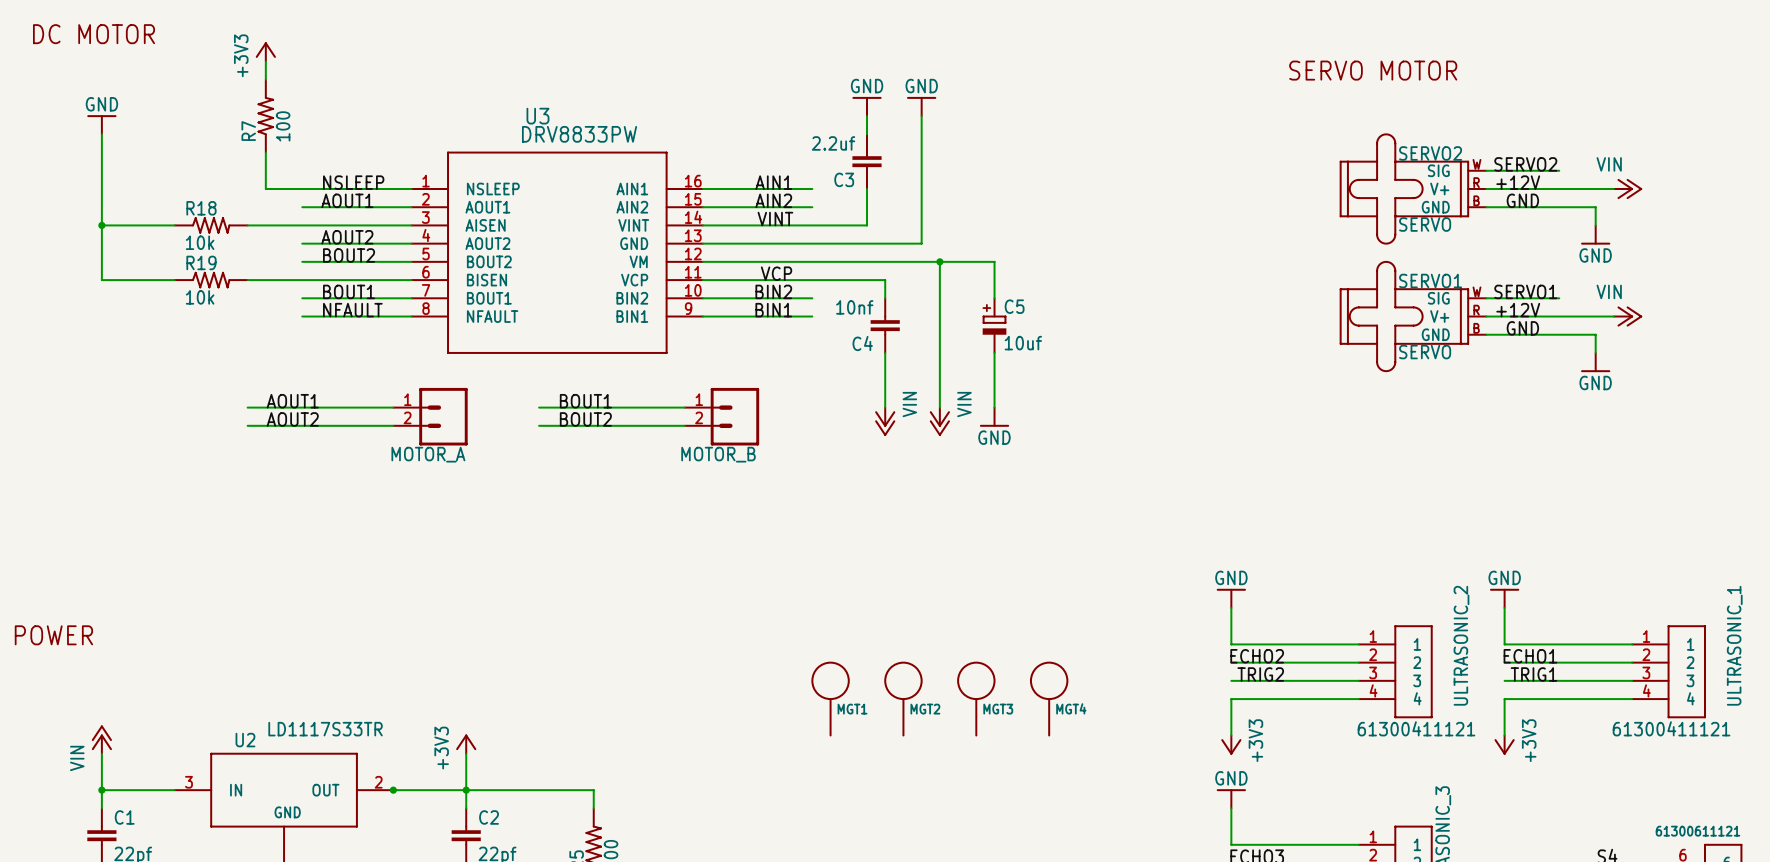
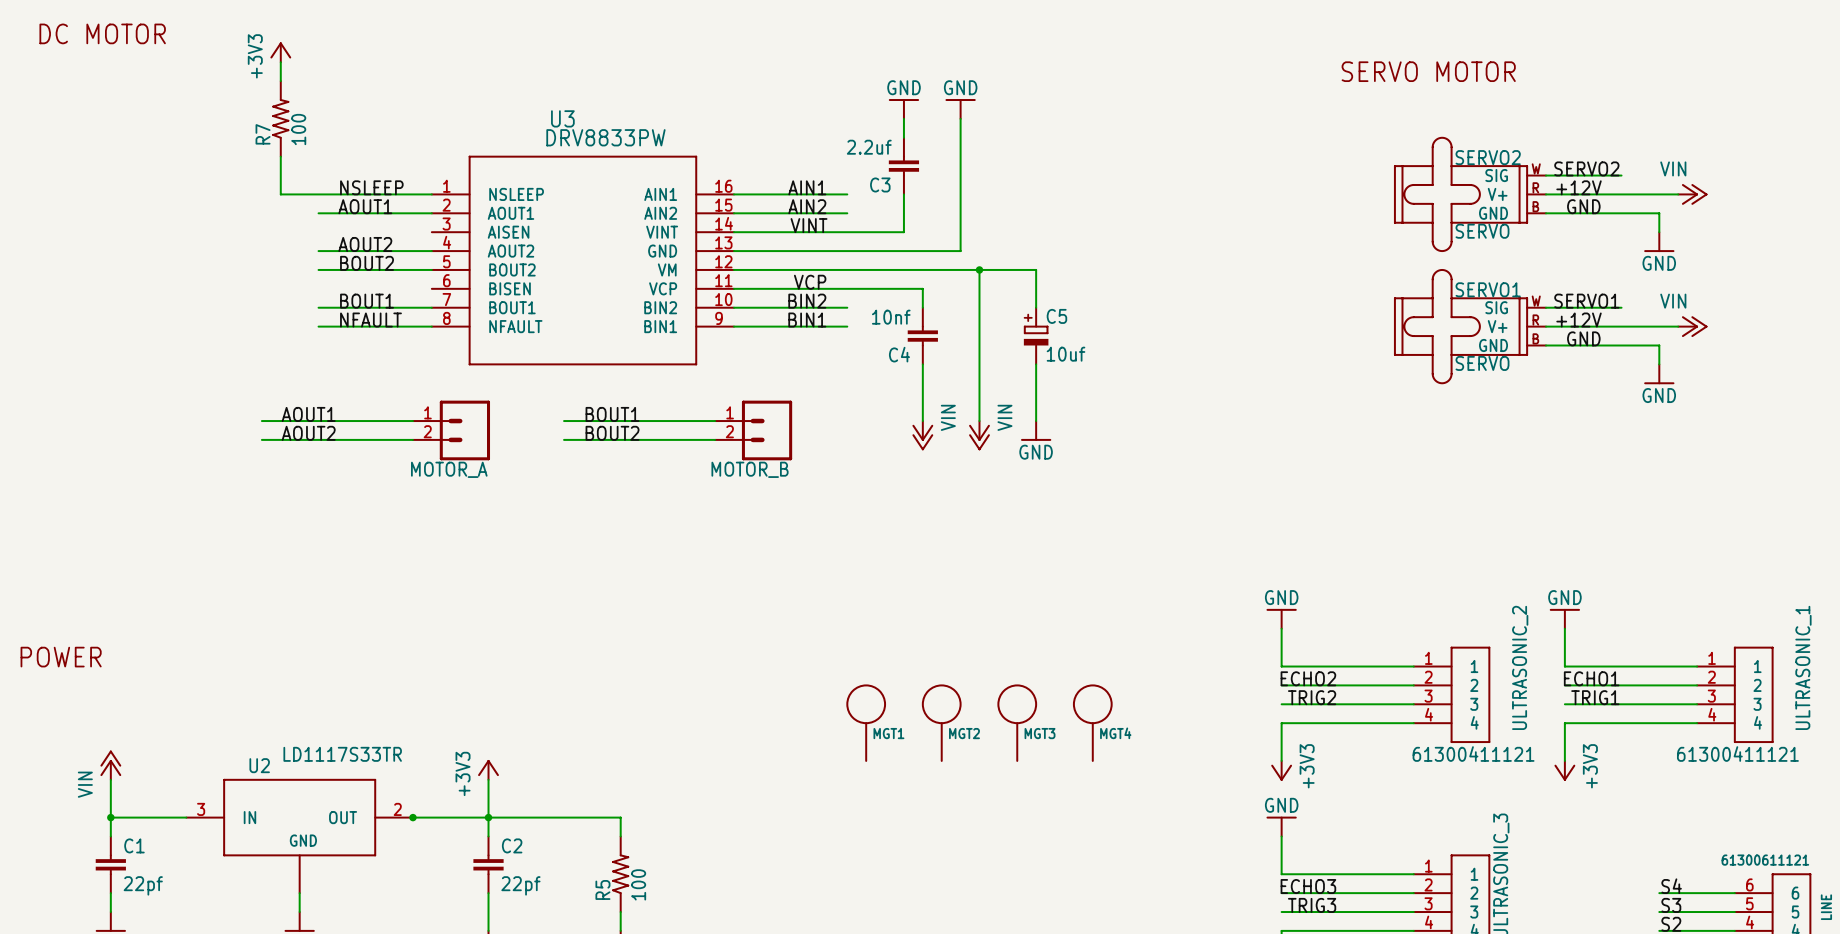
power symbol: GND (101, 124) -> none
wire: (101, 134) (101, 280) (174, 280) -> none
wire: (101, 225) (174, 225) -> none
junction: (101, 225) -> none
R18: 10k (211, 225) -> none
wire: (247, 225) (411, 225) -> none
R19: 10k (211, 280) -> none
wire: (247, 280) (411, 280) -> none

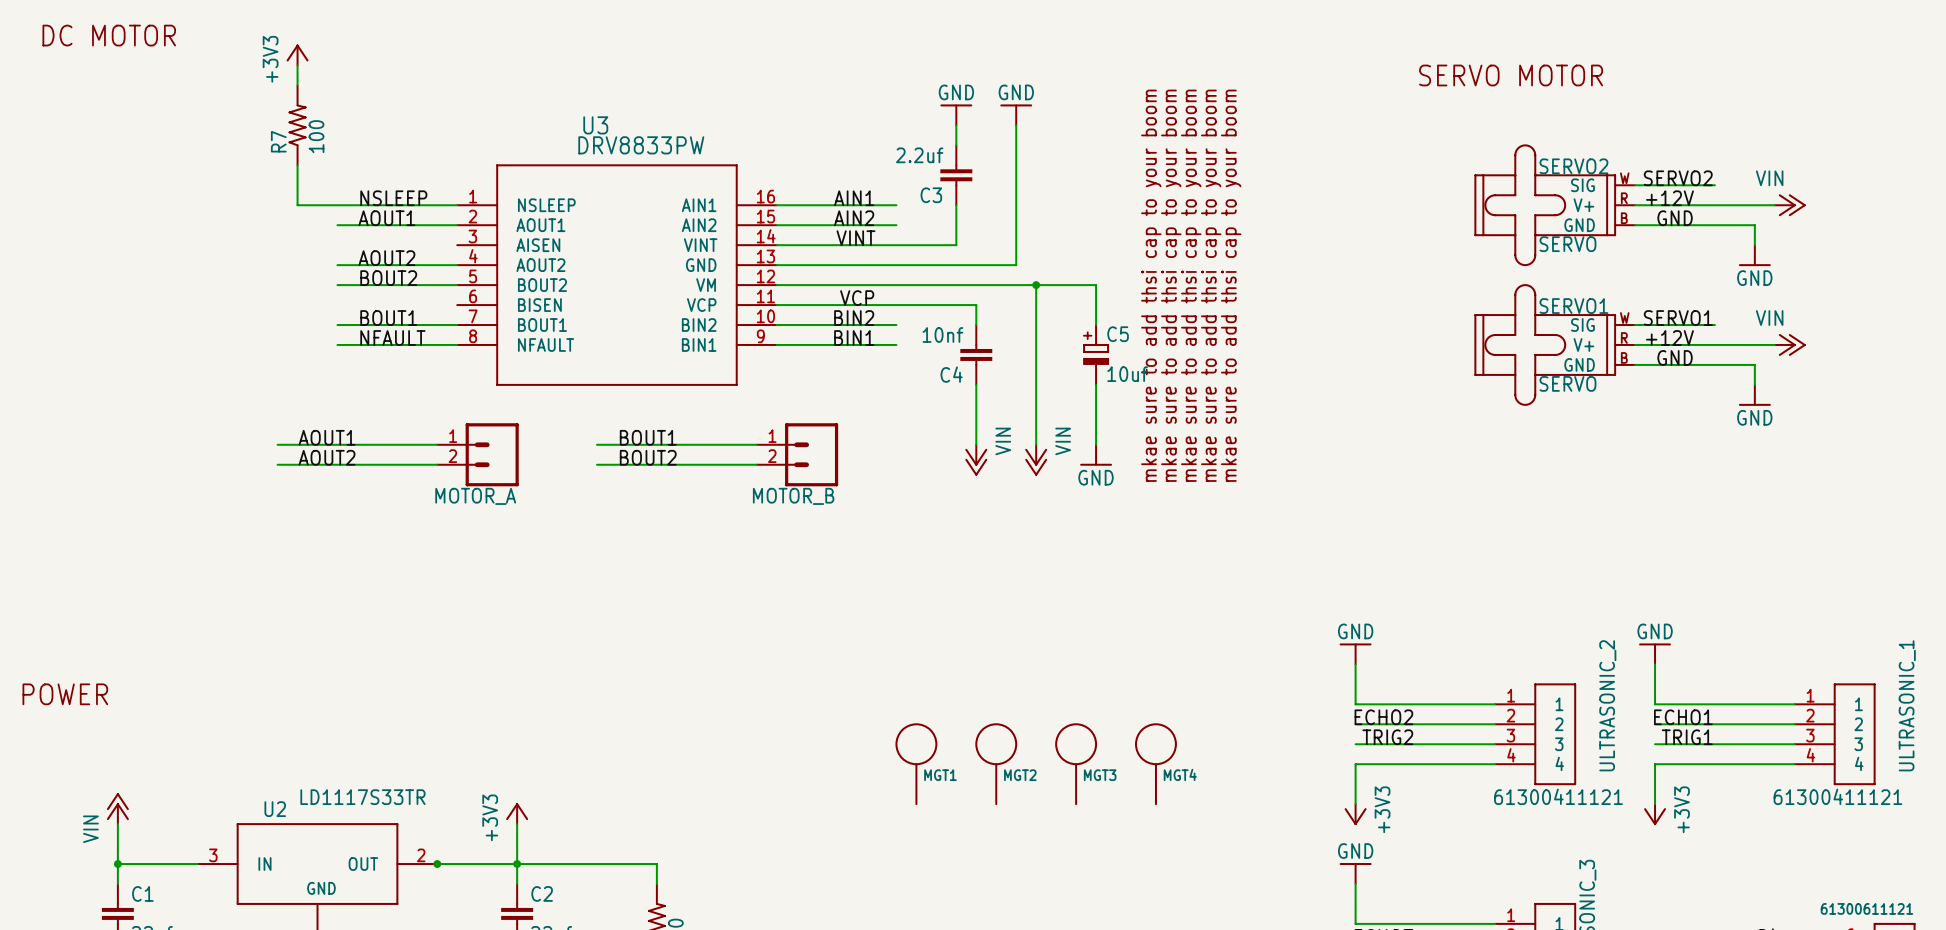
text: none -> mkae sure to add thsi cap to your boom (1151, 285)
text: none -> mkae sure to add thsi cap to your boom (1171, 285)
text: none -> mkae sure to add thsi cap to your boom (1191, 285)
text: none -> mkae sure to add thsi cap to your boom (1211, 285)
text: none -> mkae sure to add thsi cap to your boom (1231, 285)

